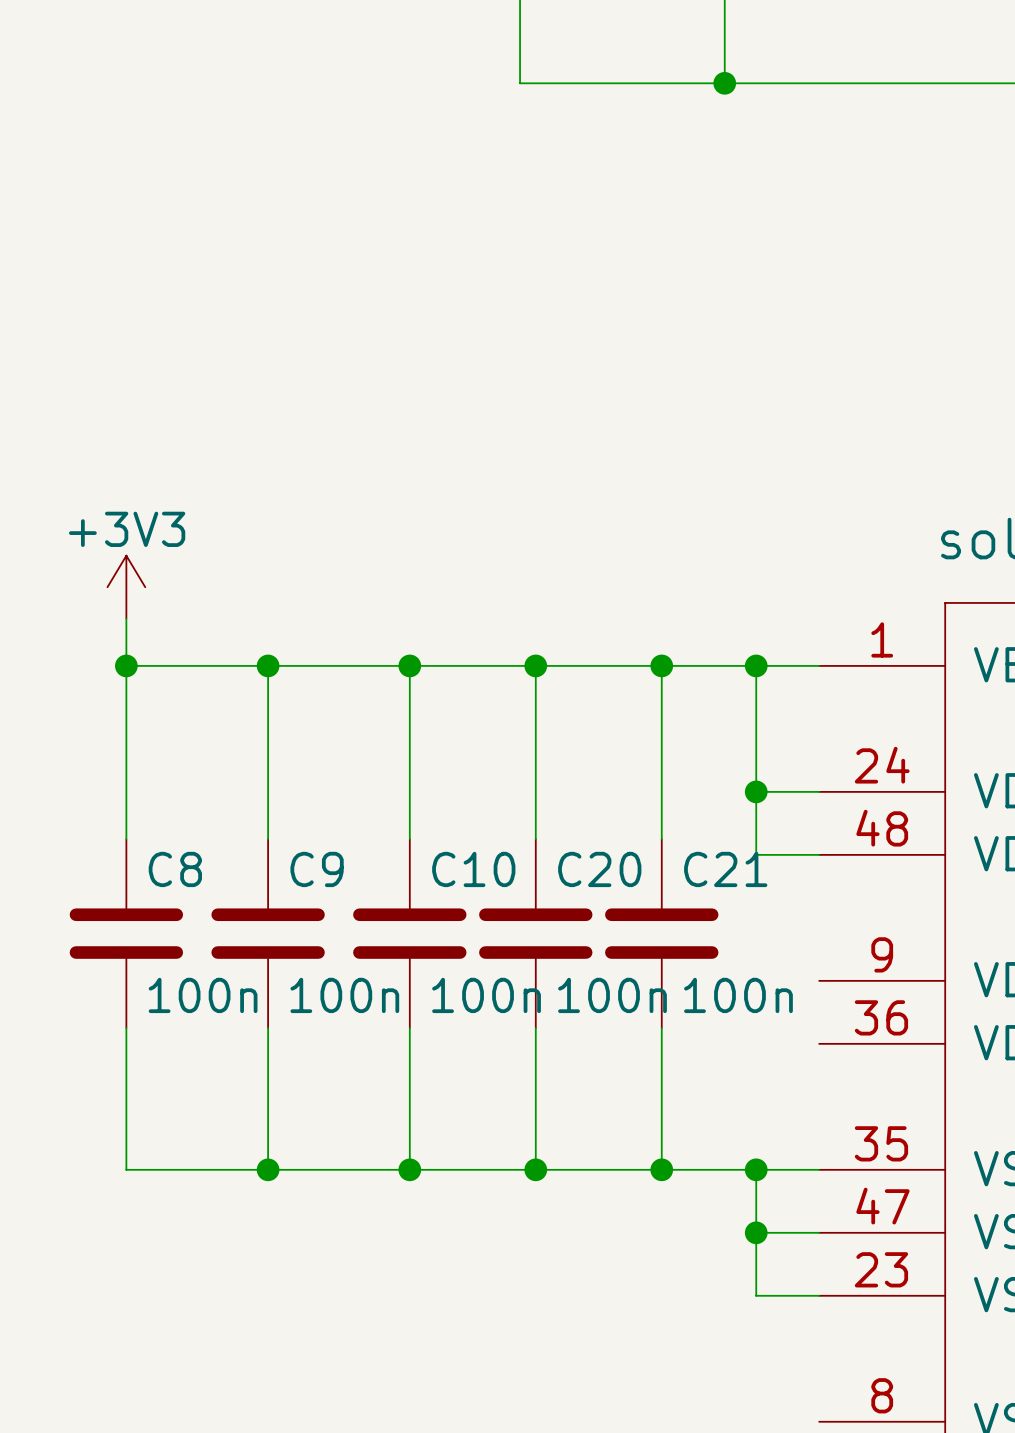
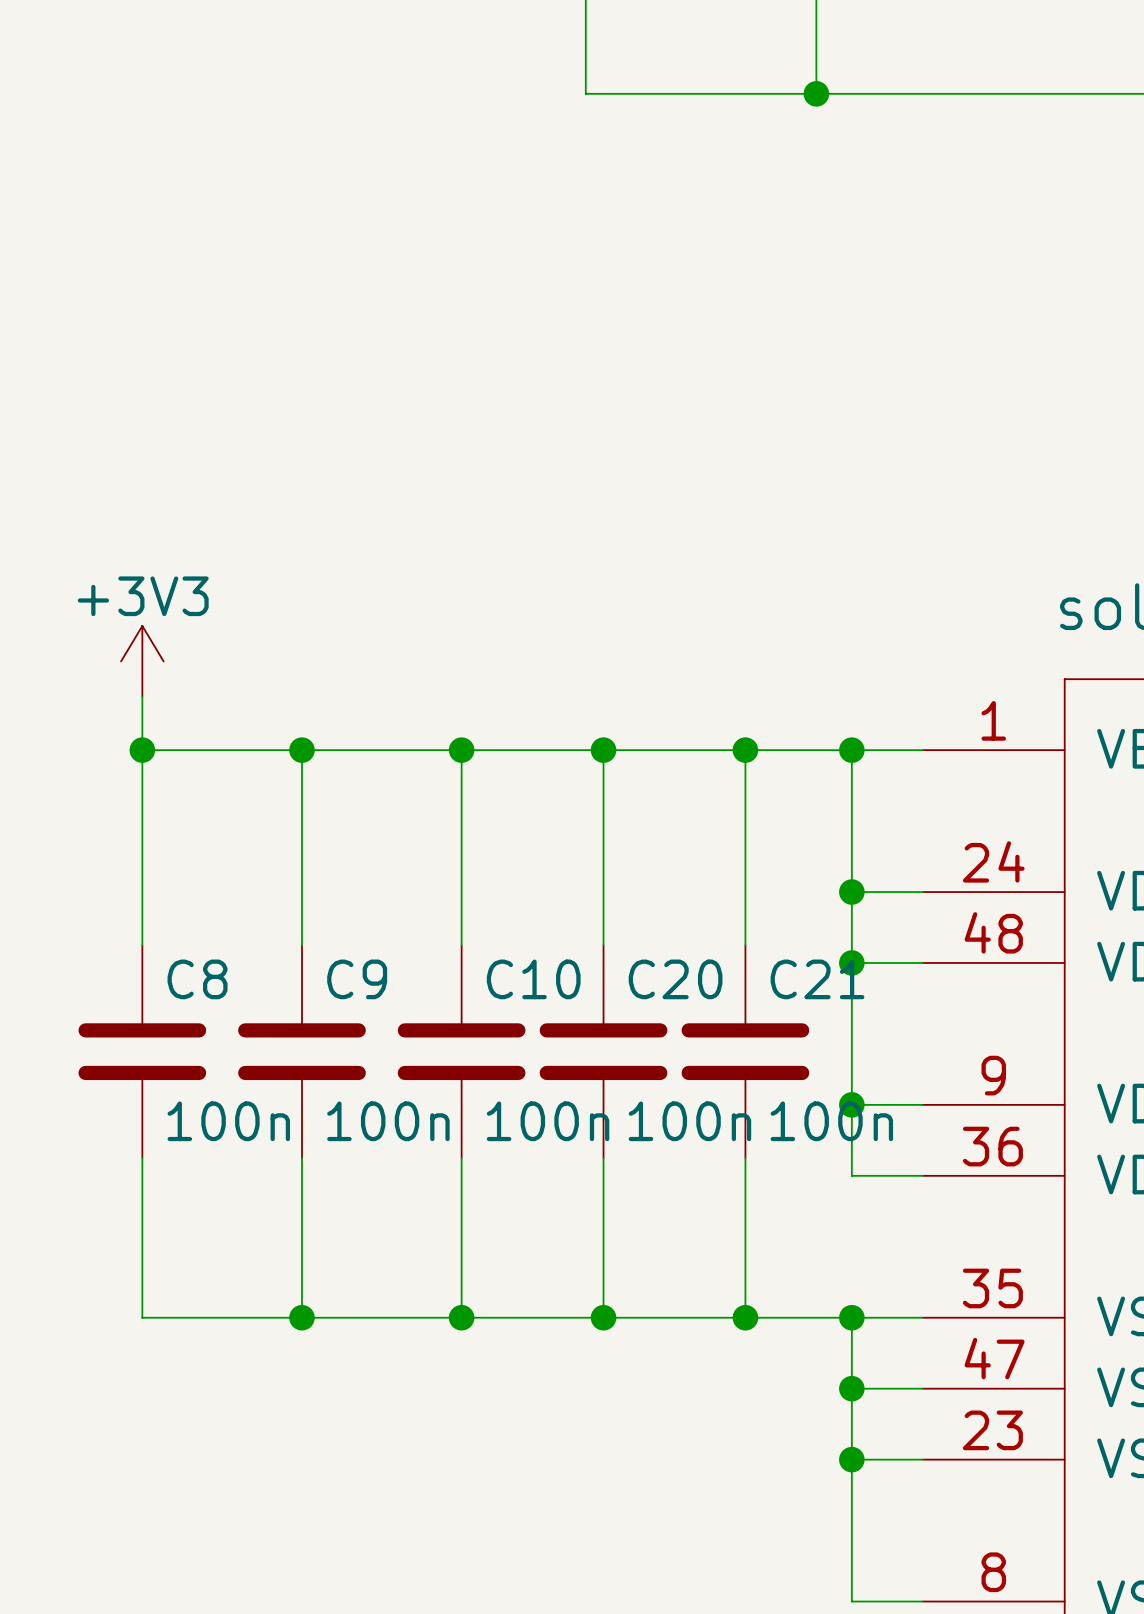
wire: none -> (851, 962) (851, 1175) (922, 1175)
junction: none -> (851, 962)
wire: none -> (851, 1104) (922, 1104)
junction: none -> (851, 1104)
wire: none -> (851, 1459) (851, 1601) (922, 1601)
junction: none -> (851, 1459)

